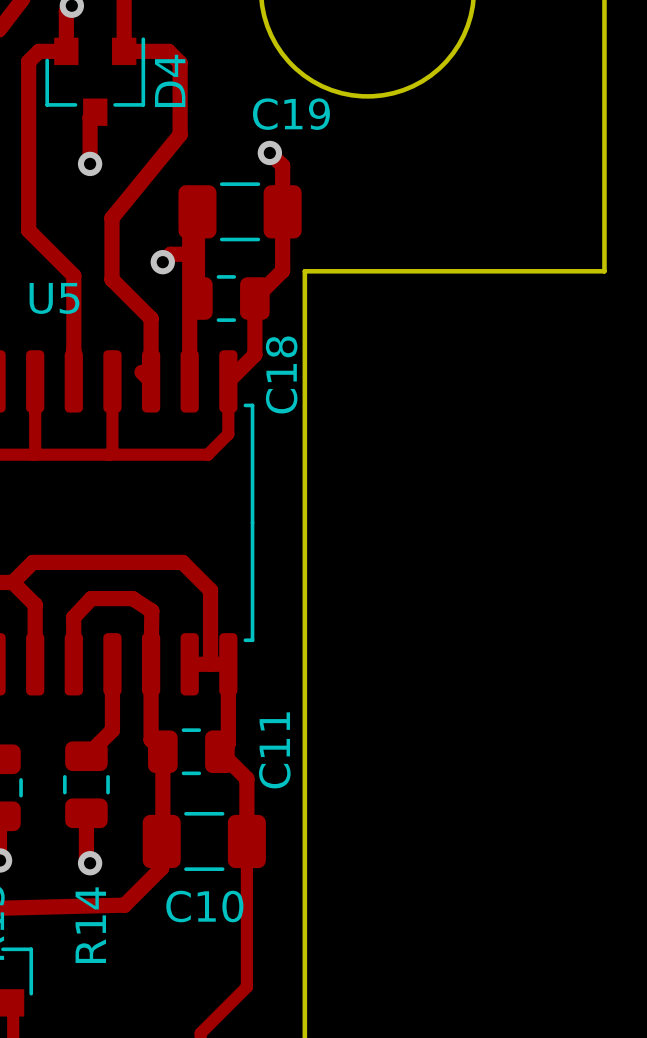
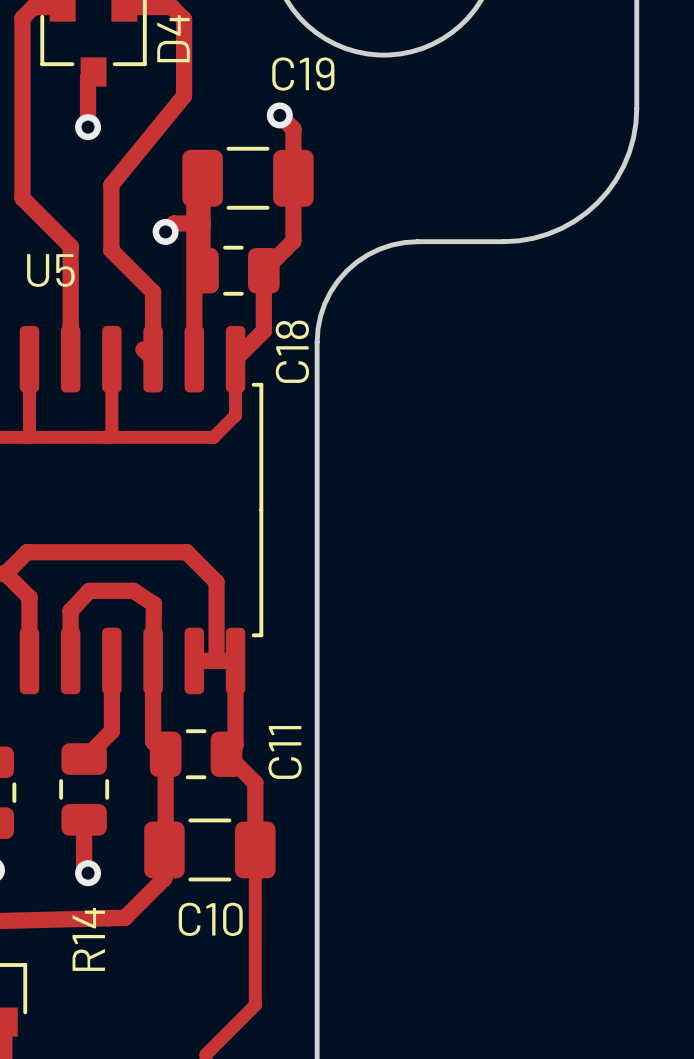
board edge: (604, 146) (604, 271) (479, 271) -> (636, 108) (633, 138) (623, 166) (607, 191) (597, 202) (574, 221) (547, 234) (518, 240) (503, 241)
board edge: (399, 271) (304, 271) (304, 365) -> (417, 241) (404, 242) (379, 249) (356, 262) (346, 271) (330, 291) (324, 303) (320, 316) (317, 342)

